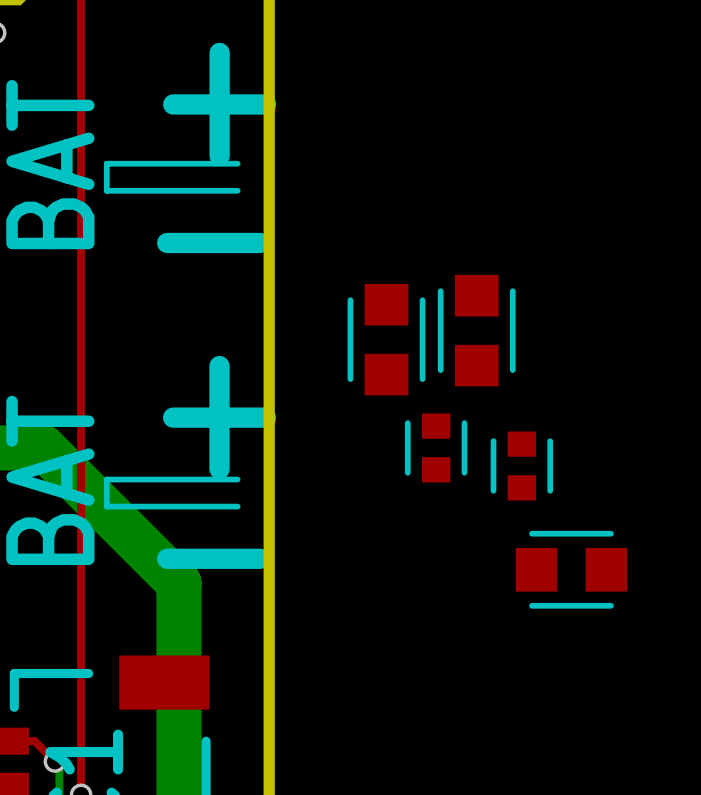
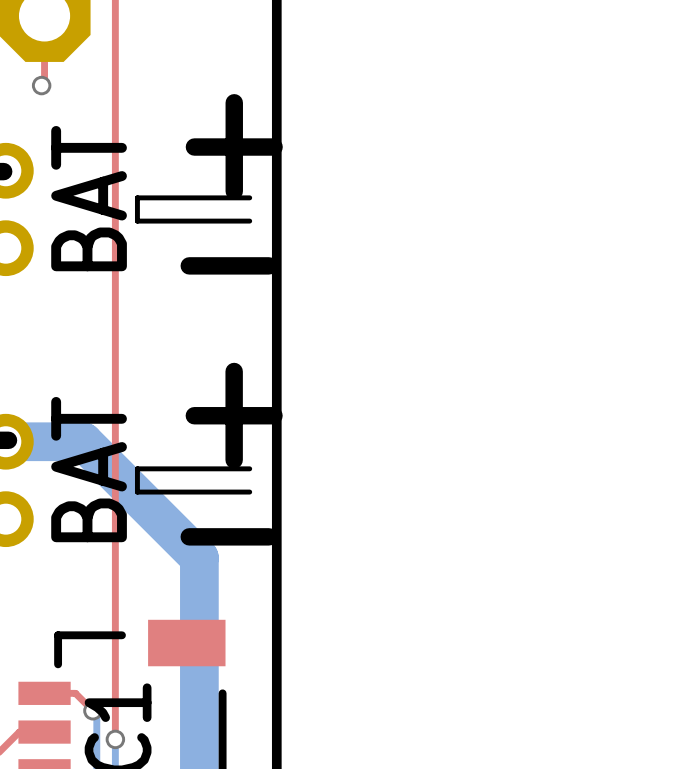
part: (476, 330) -> none
part: (386, 339) -> none
part: (436, 447) -> none
part: (521, 465) -> none
part: (571, 569) -> none

